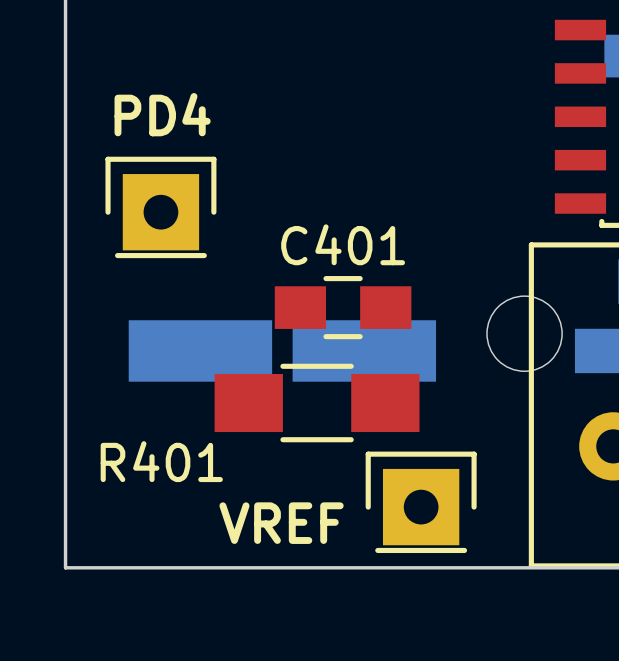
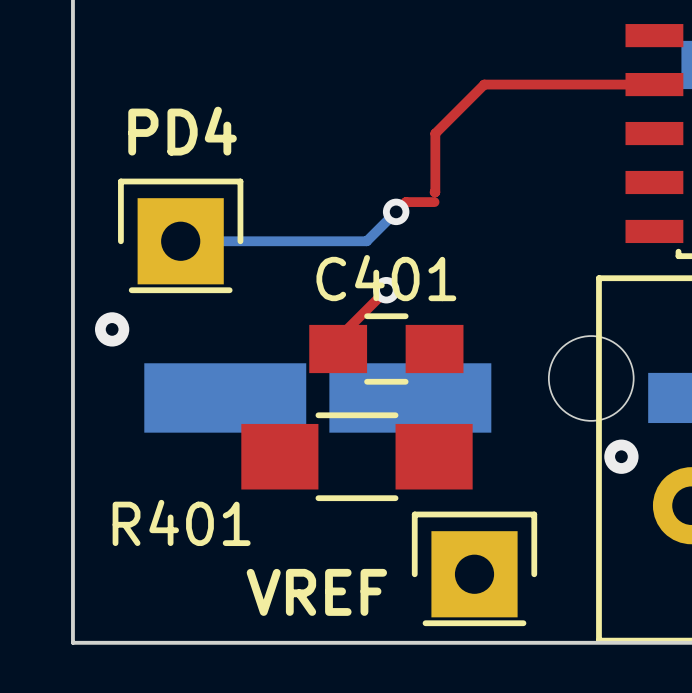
top track: none -> (654, 84) (484, 84) (435, 133) (434, 192)
top track: none -> (434, 202) (405, 202) (396, 211)
bottom track: none -> (396, 211) (366, 241) (180, 241)
via: none -> (396, 211)
top track: none -> (386, 290) (338, 338)
via: none -> (386, 290)
via: none -> (112, 329)
via: none -> (621, 456)

